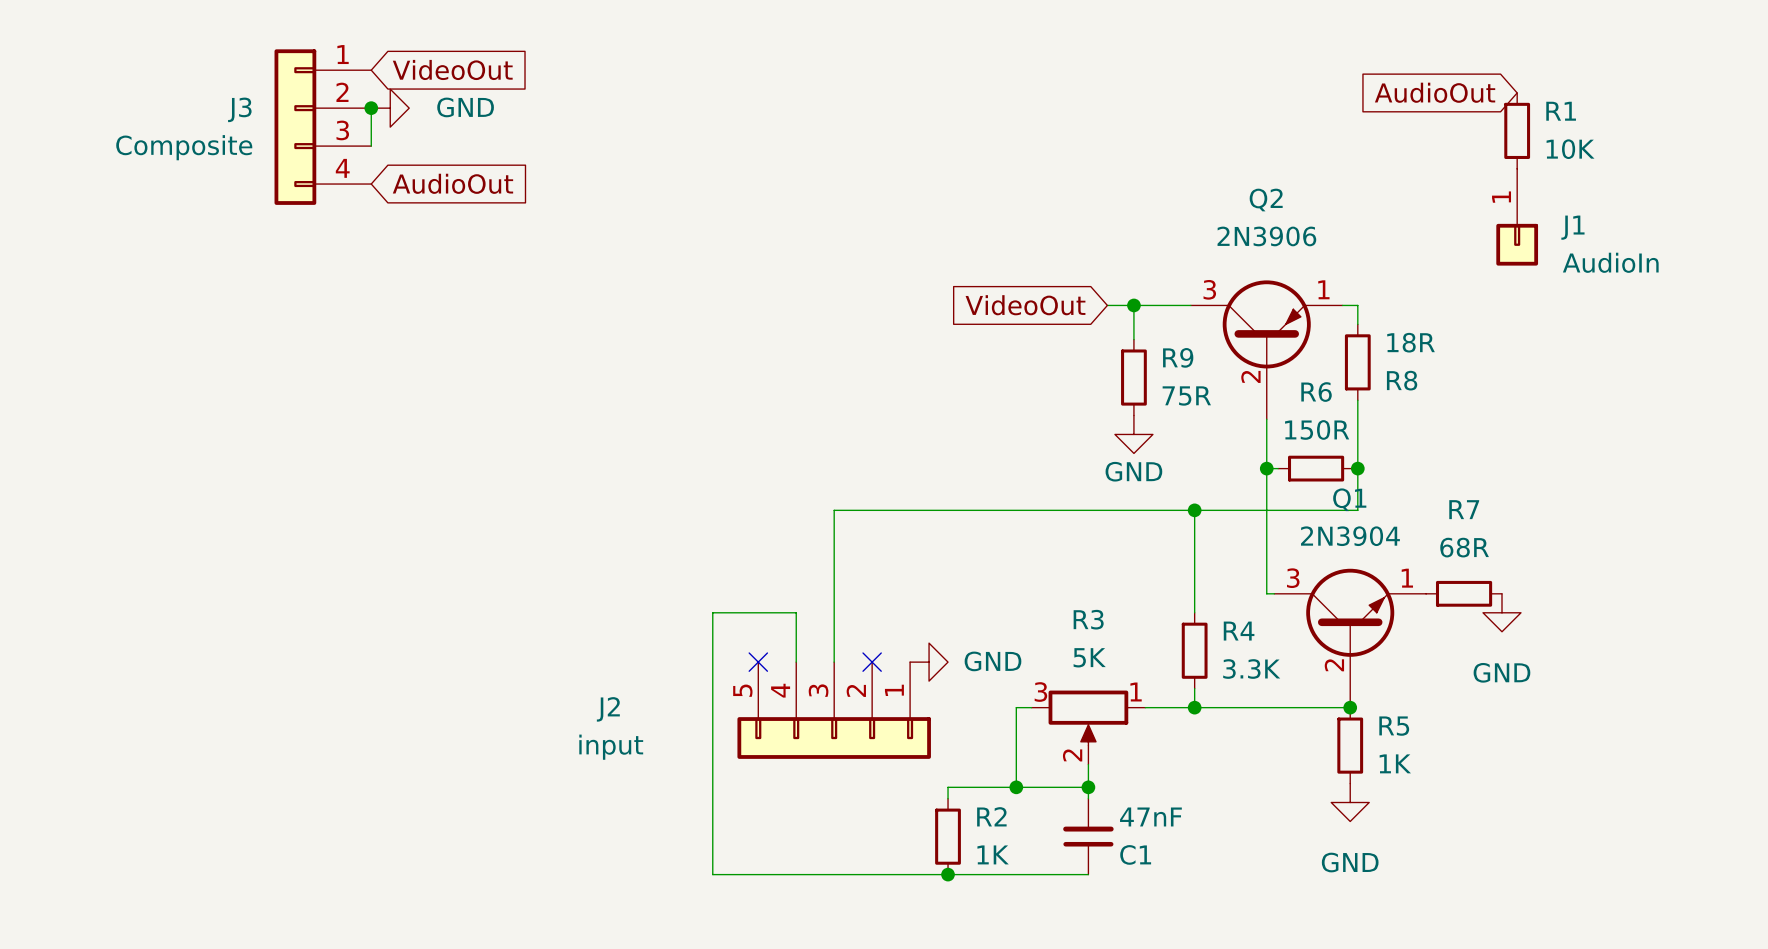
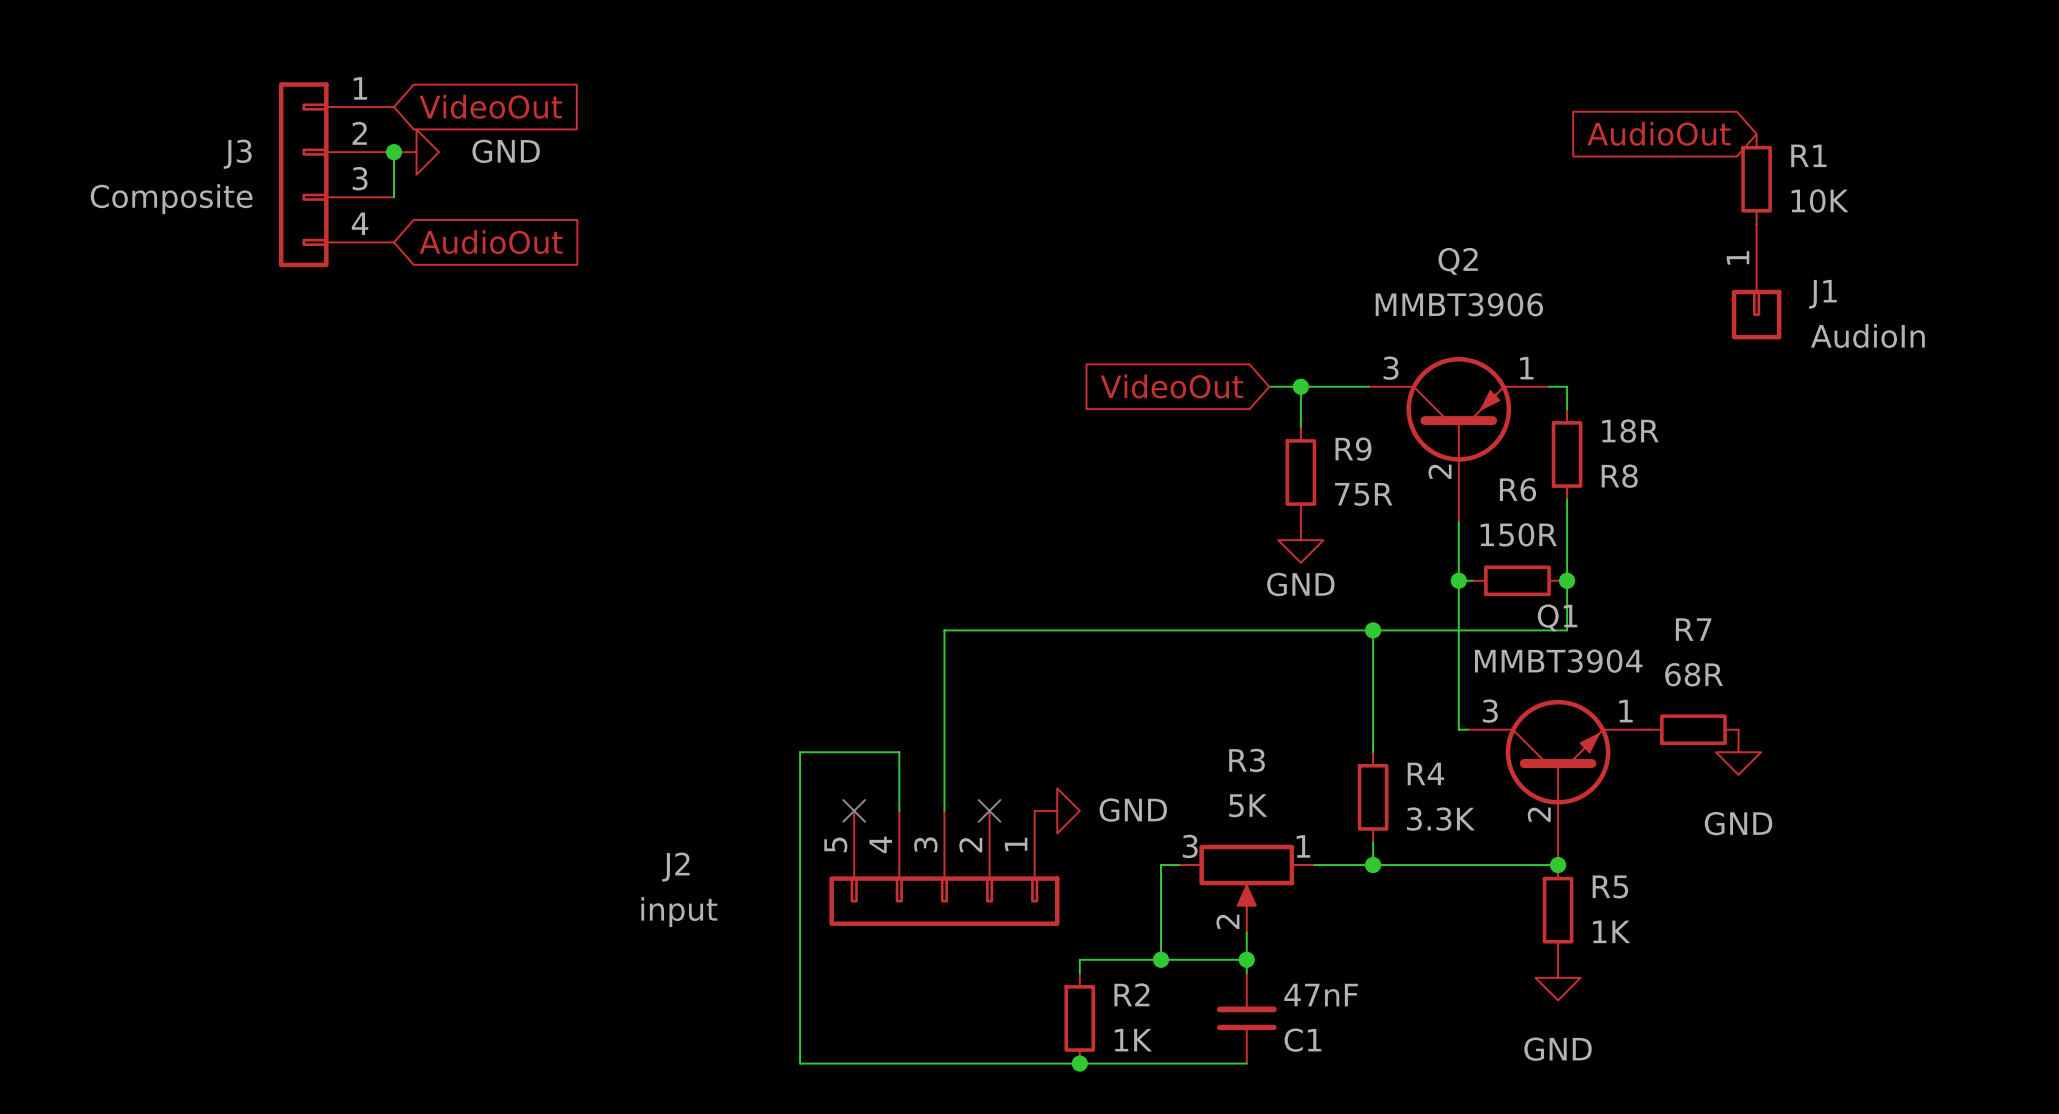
Q2 value: 2N3906 (1266, 236) -> MMBT3906 (1459, 304)
Q1 value: 2N3904 (1350, 536) -> MMBT3904 (1558, 661)

